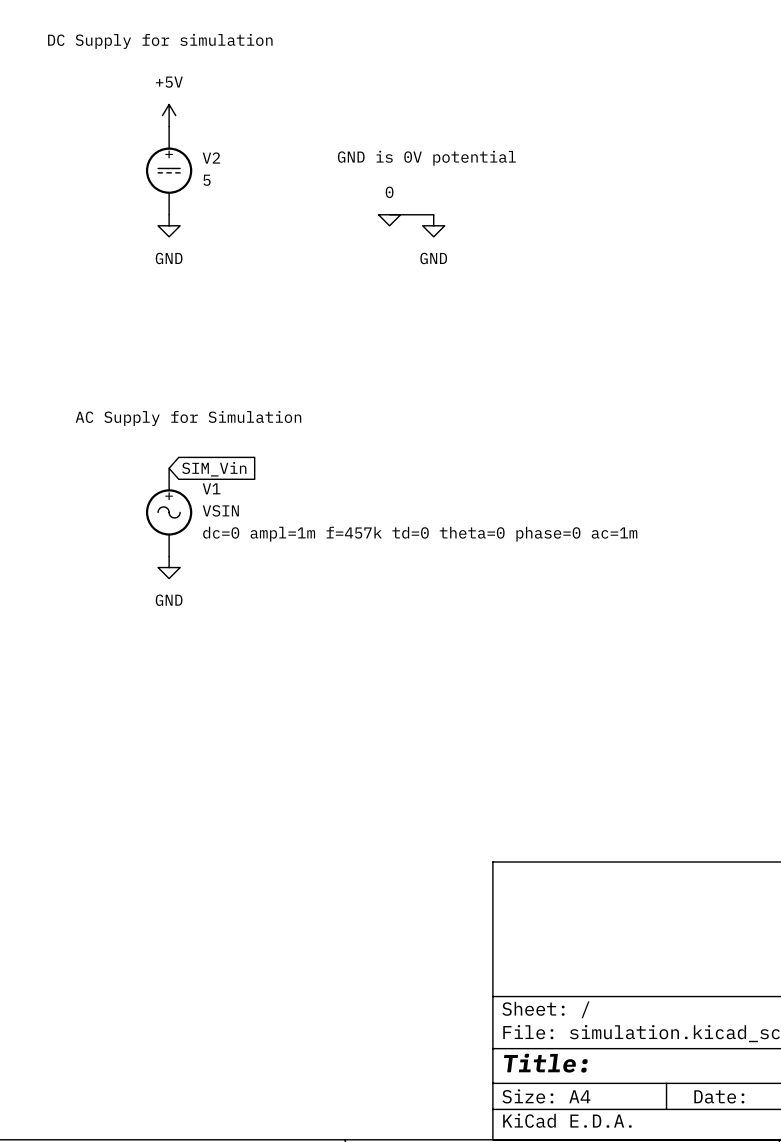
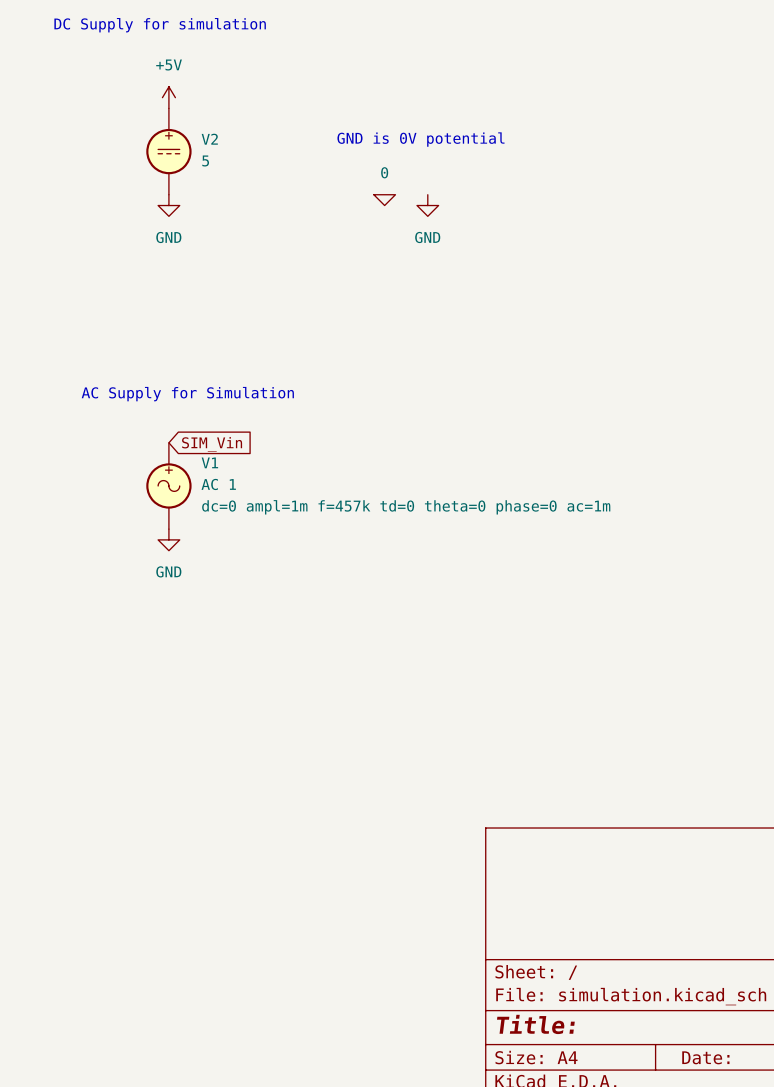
wire: (389, 214) (433, 214) -> none
V1 value: VSIN (220, 510) -> AC 1 (218, 484)

